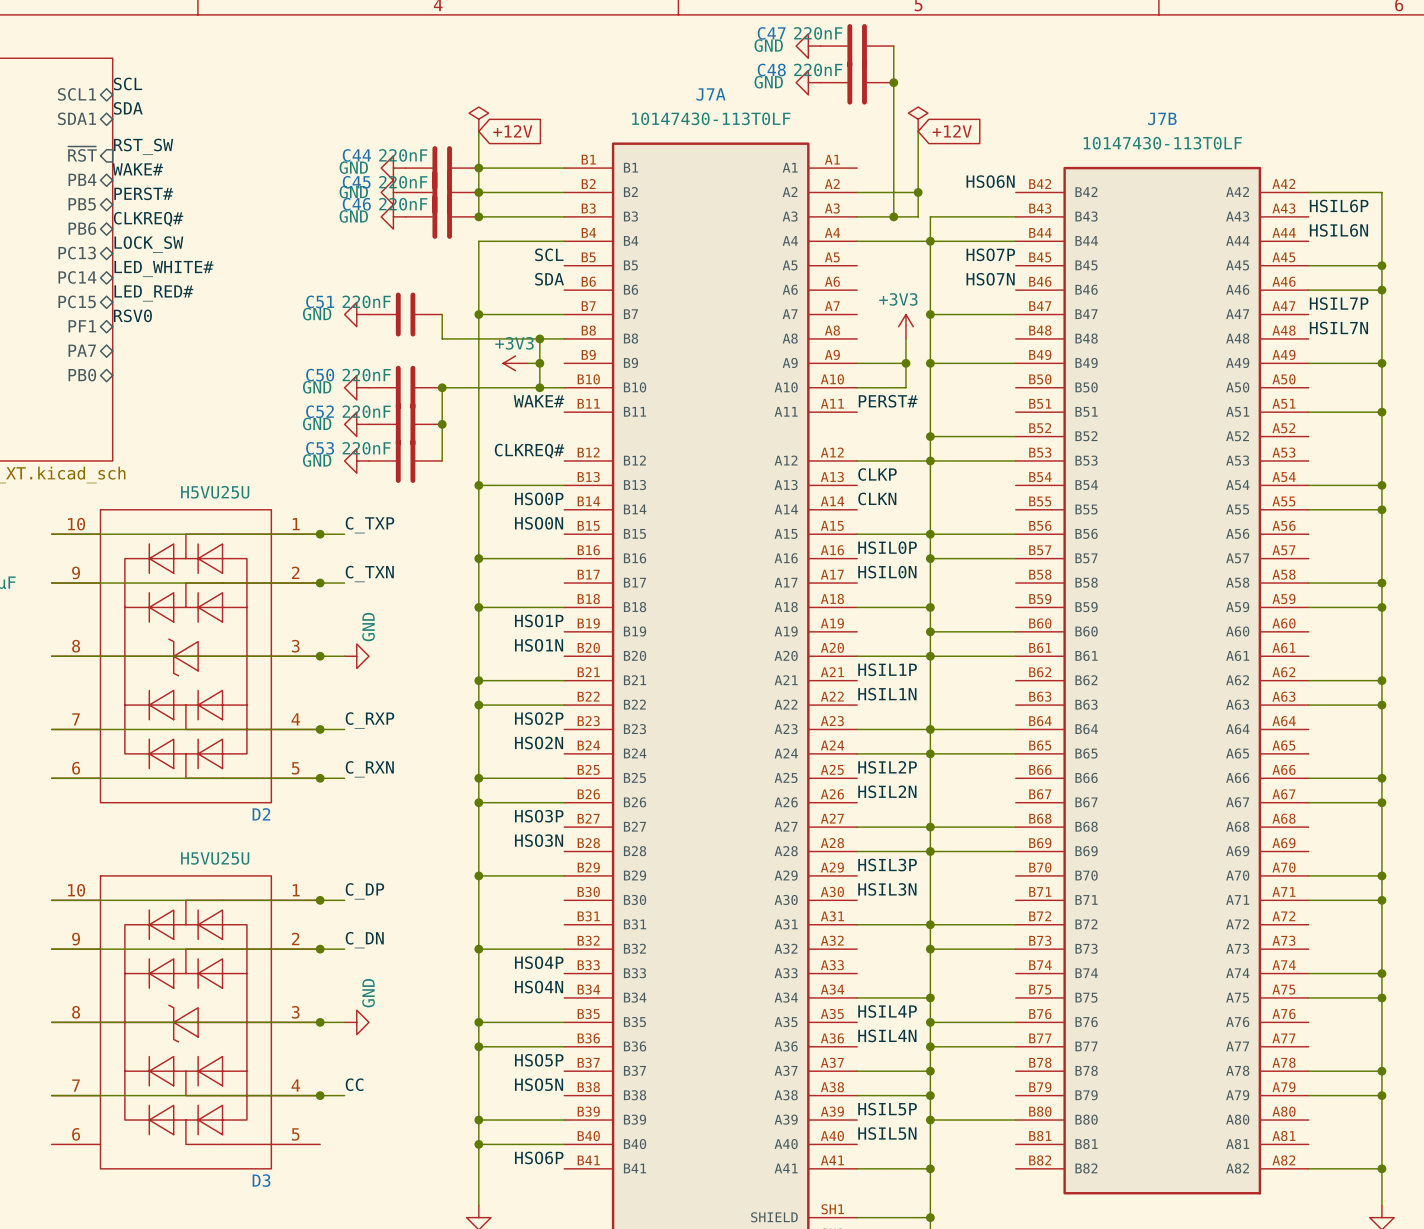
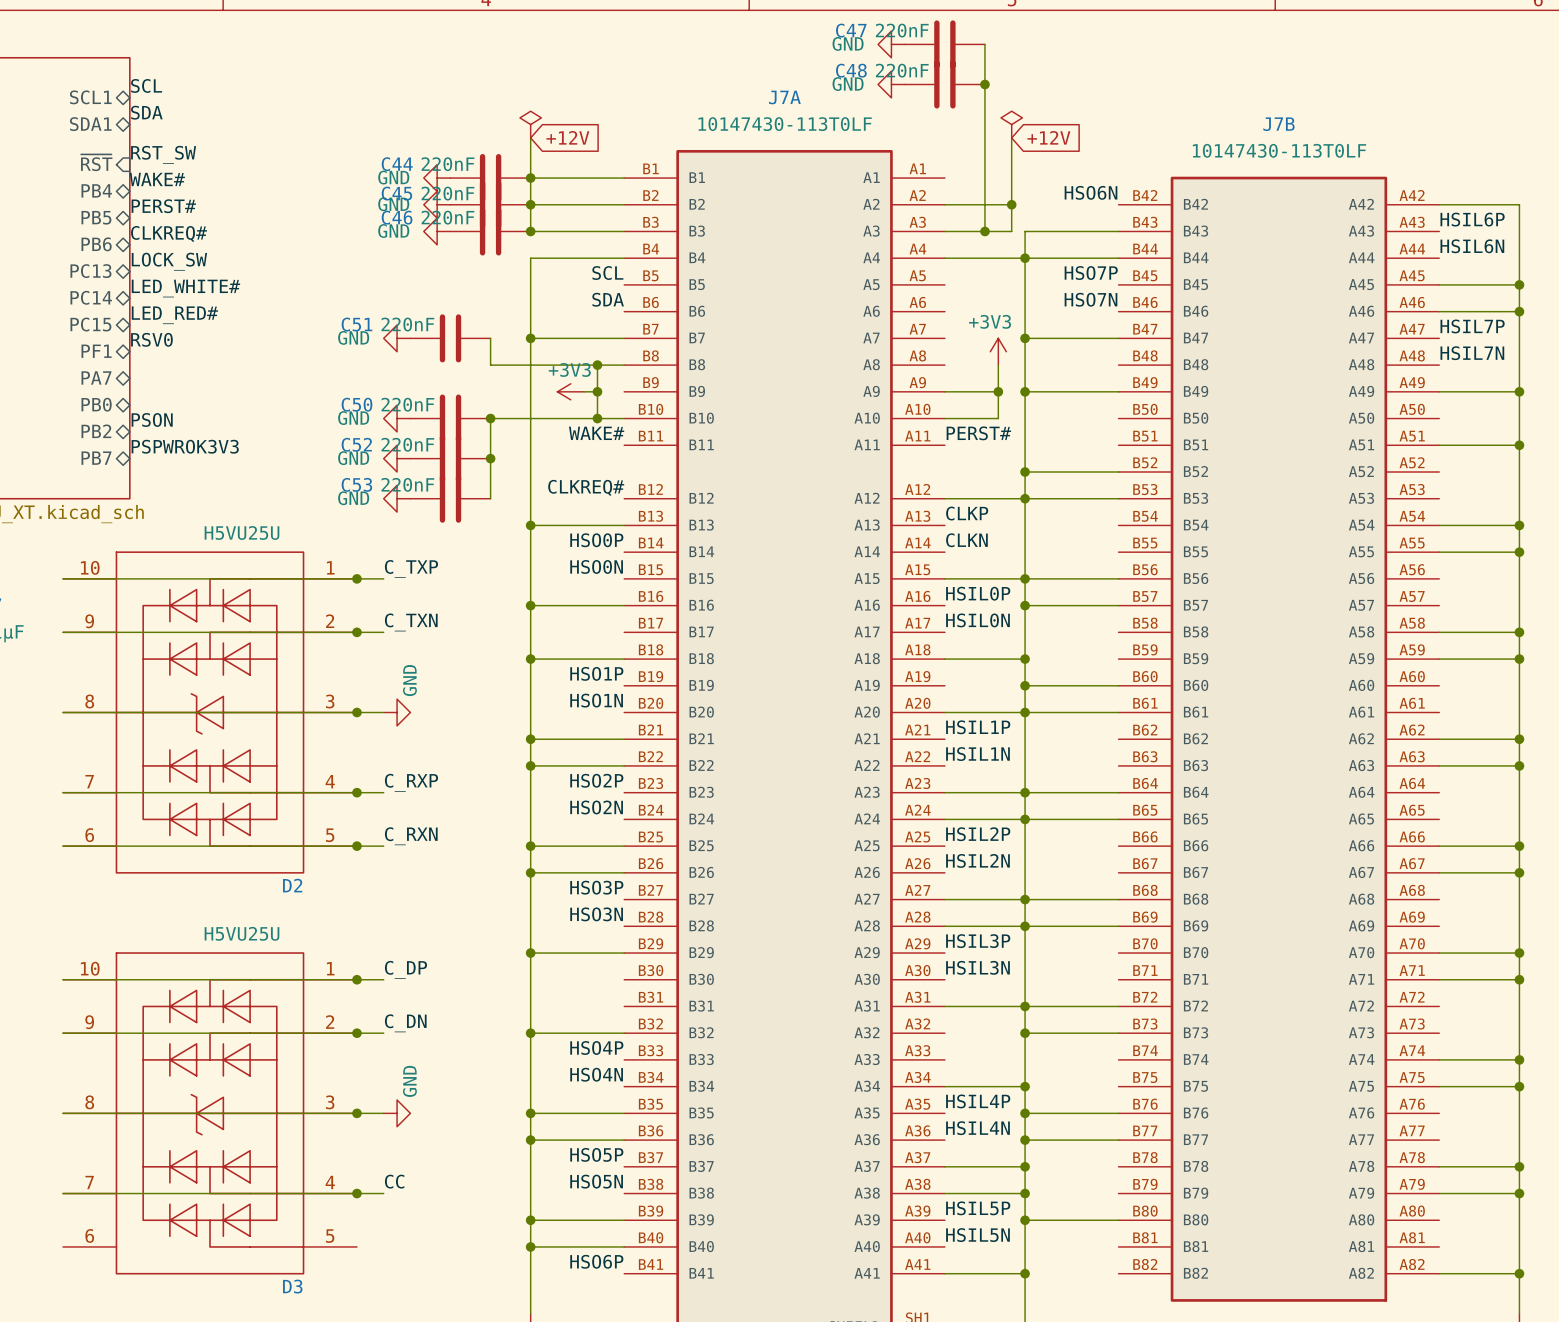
label: none -> PSON (152, 420)
sheet pin: none -> PB2 (96, 431)
label: none -> PSPWROK3V3 (185, 446)
sheet pin: none -> PB7 (96, 458)

